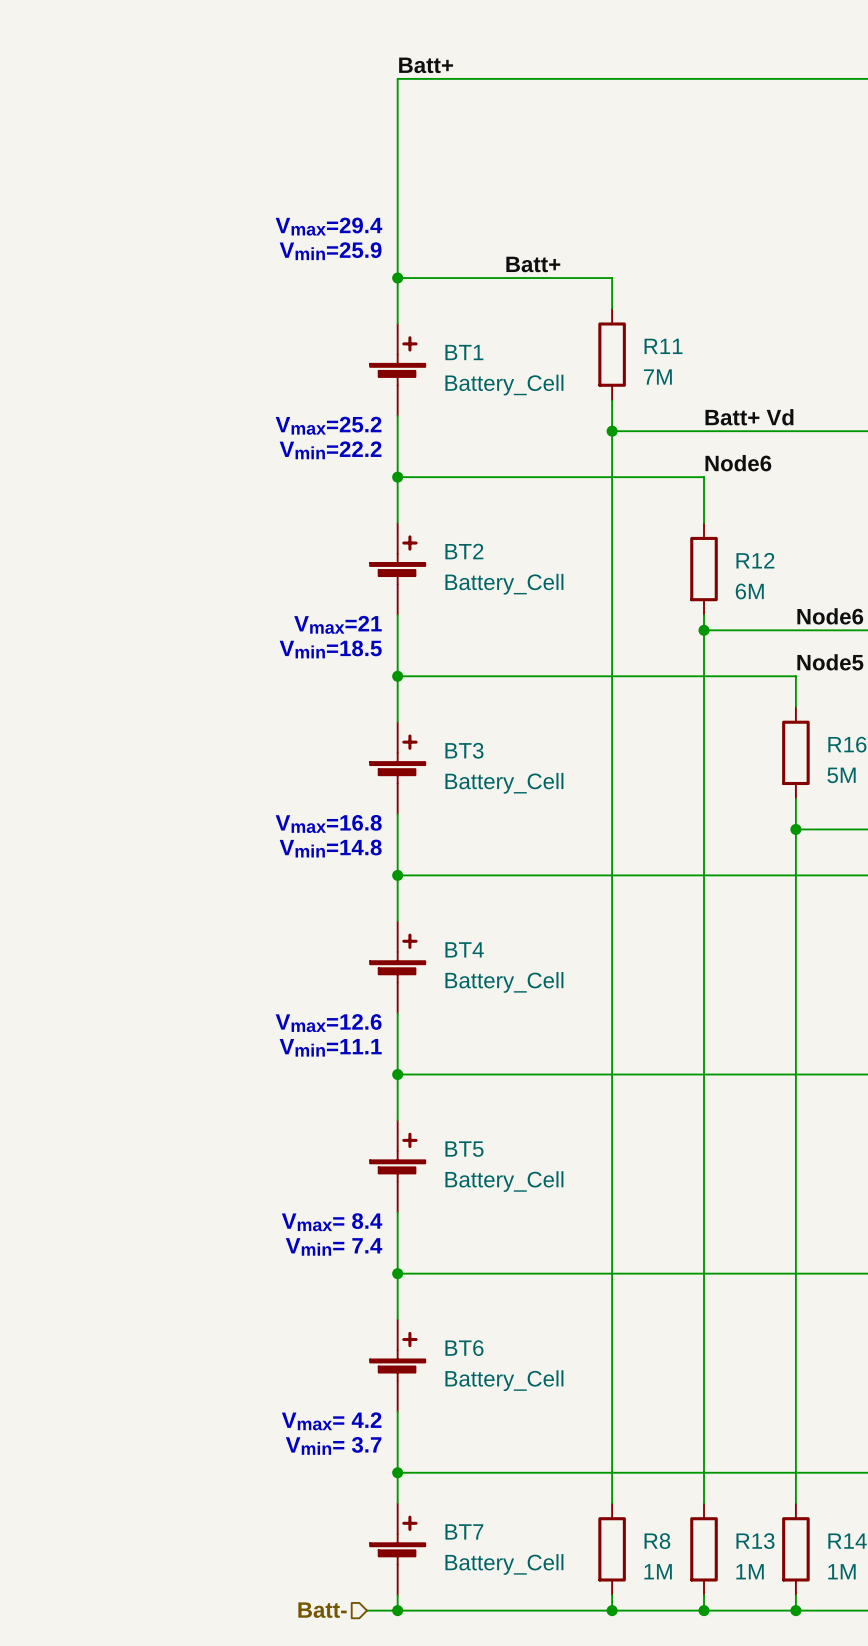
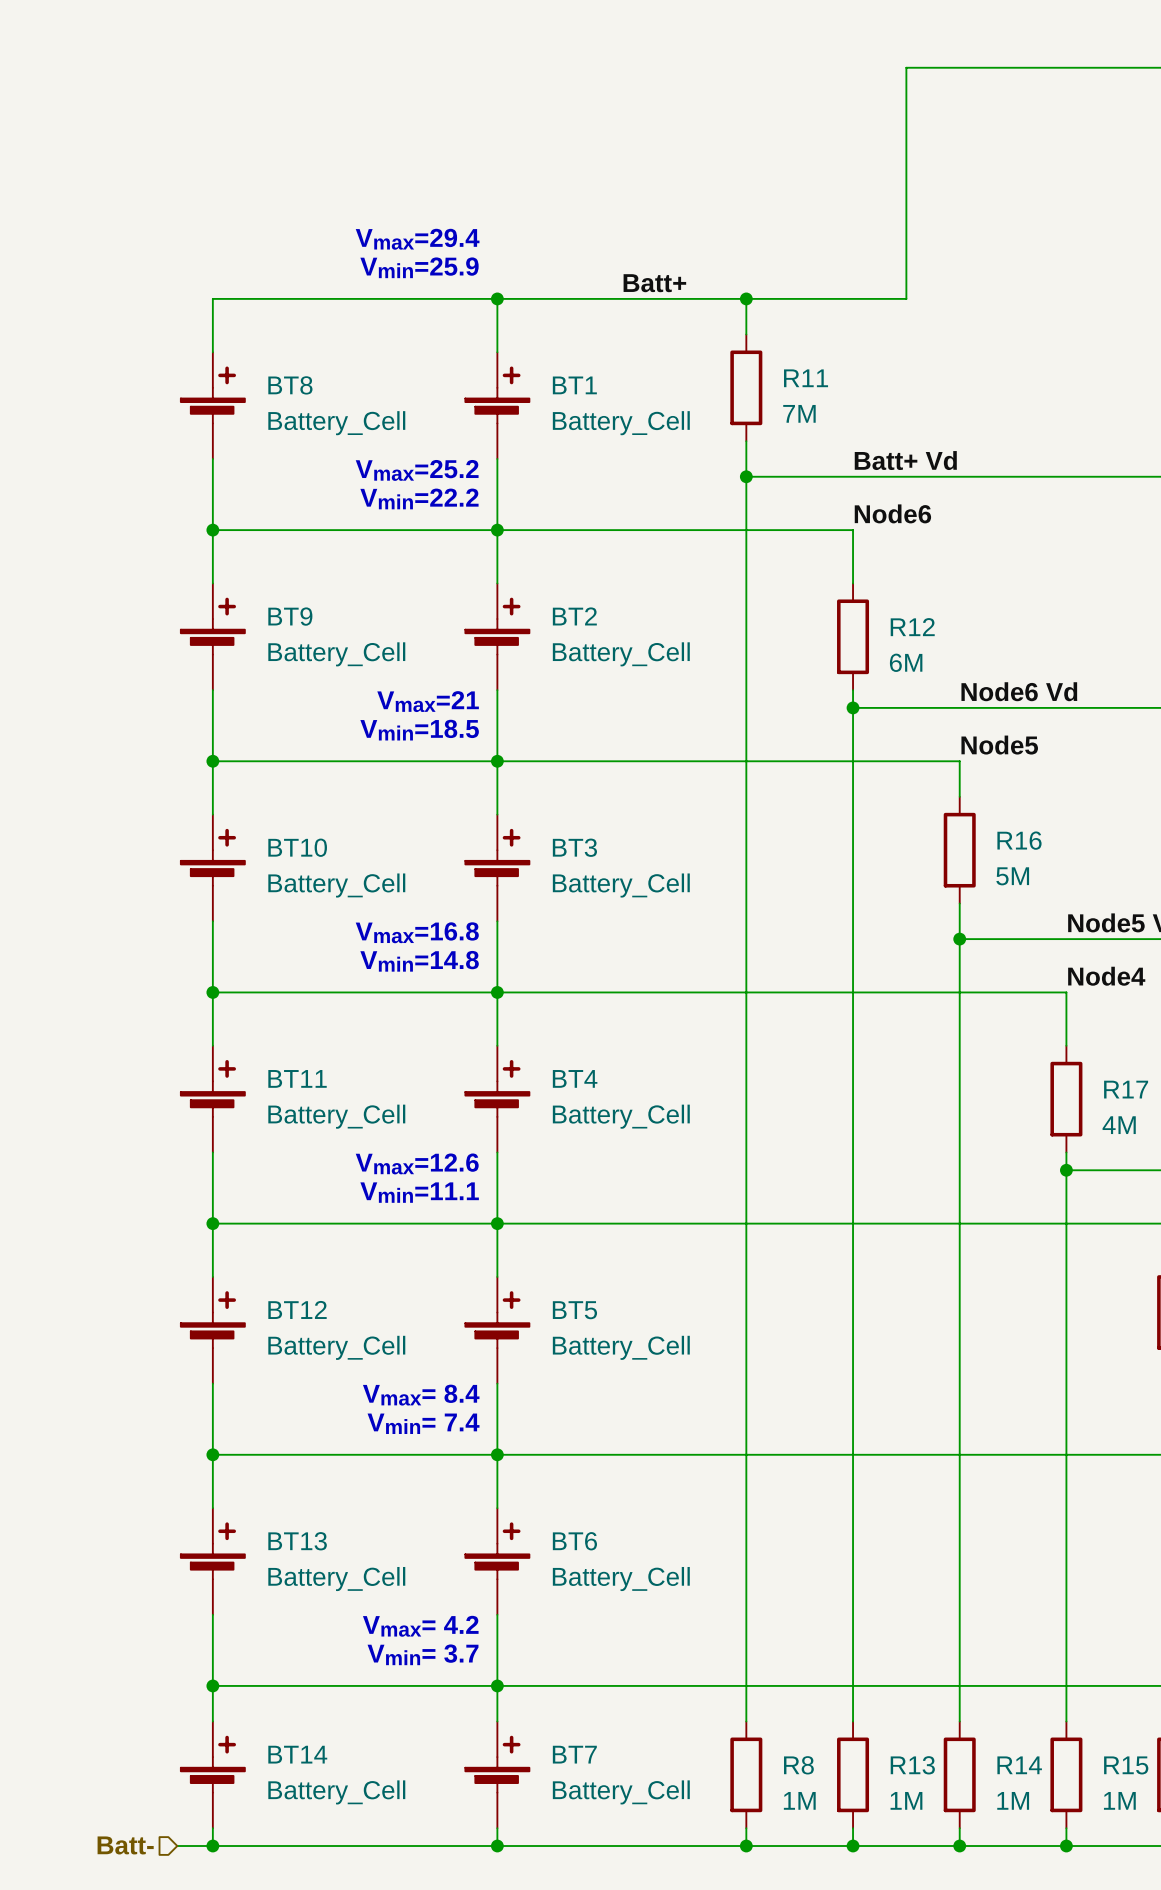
label: Batt+ (426, 65) -> none
wire: (749, 78) (397, 78) (397, 278) -> (906, 67) (906, 298) (746, 298)
wire: none -> (497, 298) (212, 298) (212, 352)
junction: none -> (746, 298)
BT8: none -> Battery_Cell (212, 405)
wire: none -> (212, 458) (212, 583)
wire: none -> (212, 530) (497, 530)
junction: none -> (212, 530)
BT9: none -> Battery_Cell (212, 636)
wire: none -> (212, 690) (212, 814)
wire: none -> (212, 761) (497, 761)
junction: none -> (212, 761)
BT10: none -> Battery_Cell (212, 867)
wire: none -> (212, 921) (212, 1045)
wire: none -> (212, 992) (497, 992)
junction: none -> (212, 992)
BT11: none -> Battery_Cell (212, 1099)
wire: none -> (212, 1152) (212, 1276)
wire: none -> (212, 1223) (497, 1223)
junction: none -> (212, 1223)
BT12: none -> Battery_Cell (212, 1330)
wire: none -> (212, 1383) (212, 1508)
wire: none -> (212, 1454) (497, 1454)
junction: none -> (212, 1454)
BT13: none -> Battery_Cell (212, 1561)
wire: none -> (212, 1614) (212, 1721)
wire: none -> (212, 1685) (497, 1685)
junction: none -> (212, 1685)
BT14: none -> Battery_Cell (212, 1774)
wire: none -> (212, 1828) (212, 1846)
wire: none -> (177, 1846) (461, 1846)
junction: none -> (212, 1846)
hierarchical label position: Batt- (322, 1610) -> Batt- (125, 1845)

